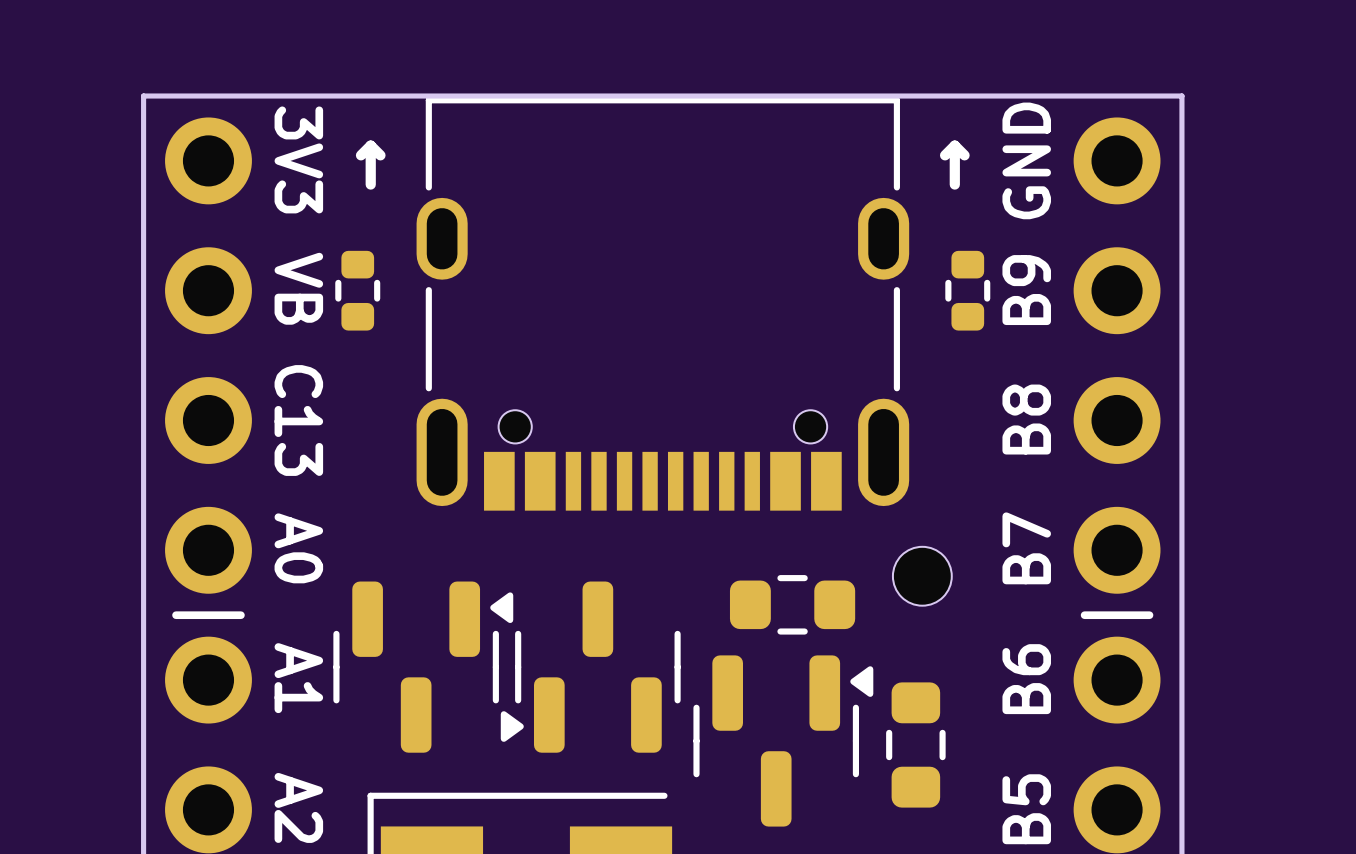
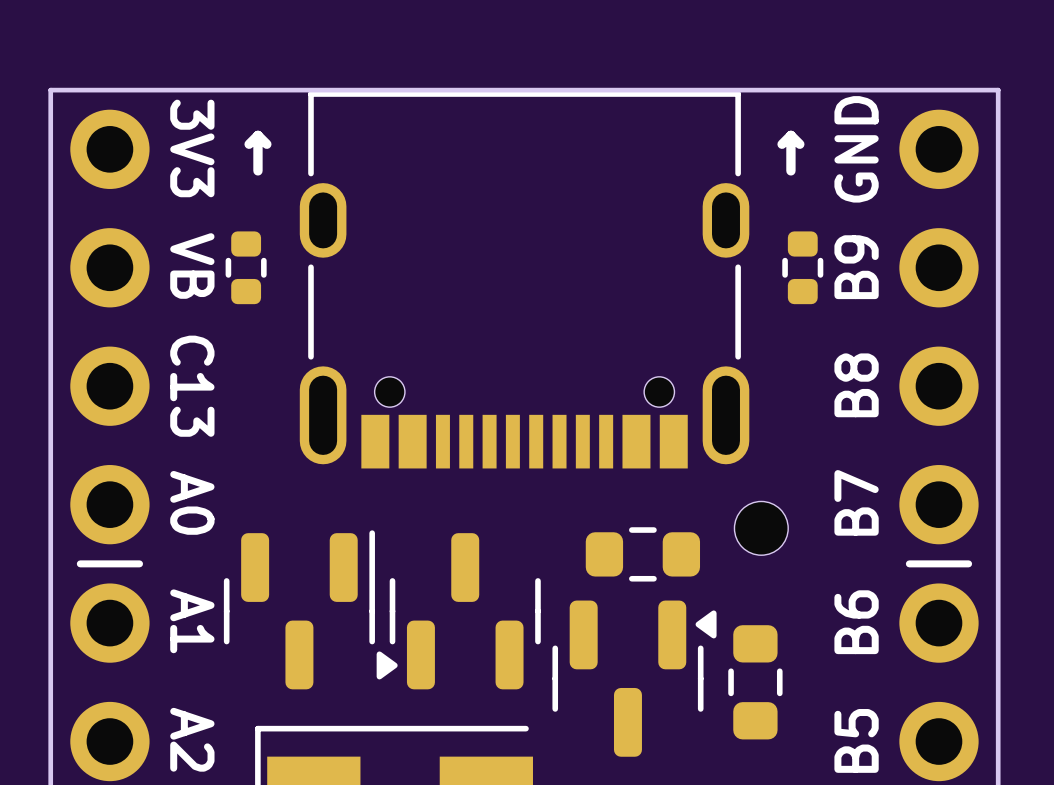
part footprint: [333, 581, 514, 753] -> [223, 530, 375, 690]

